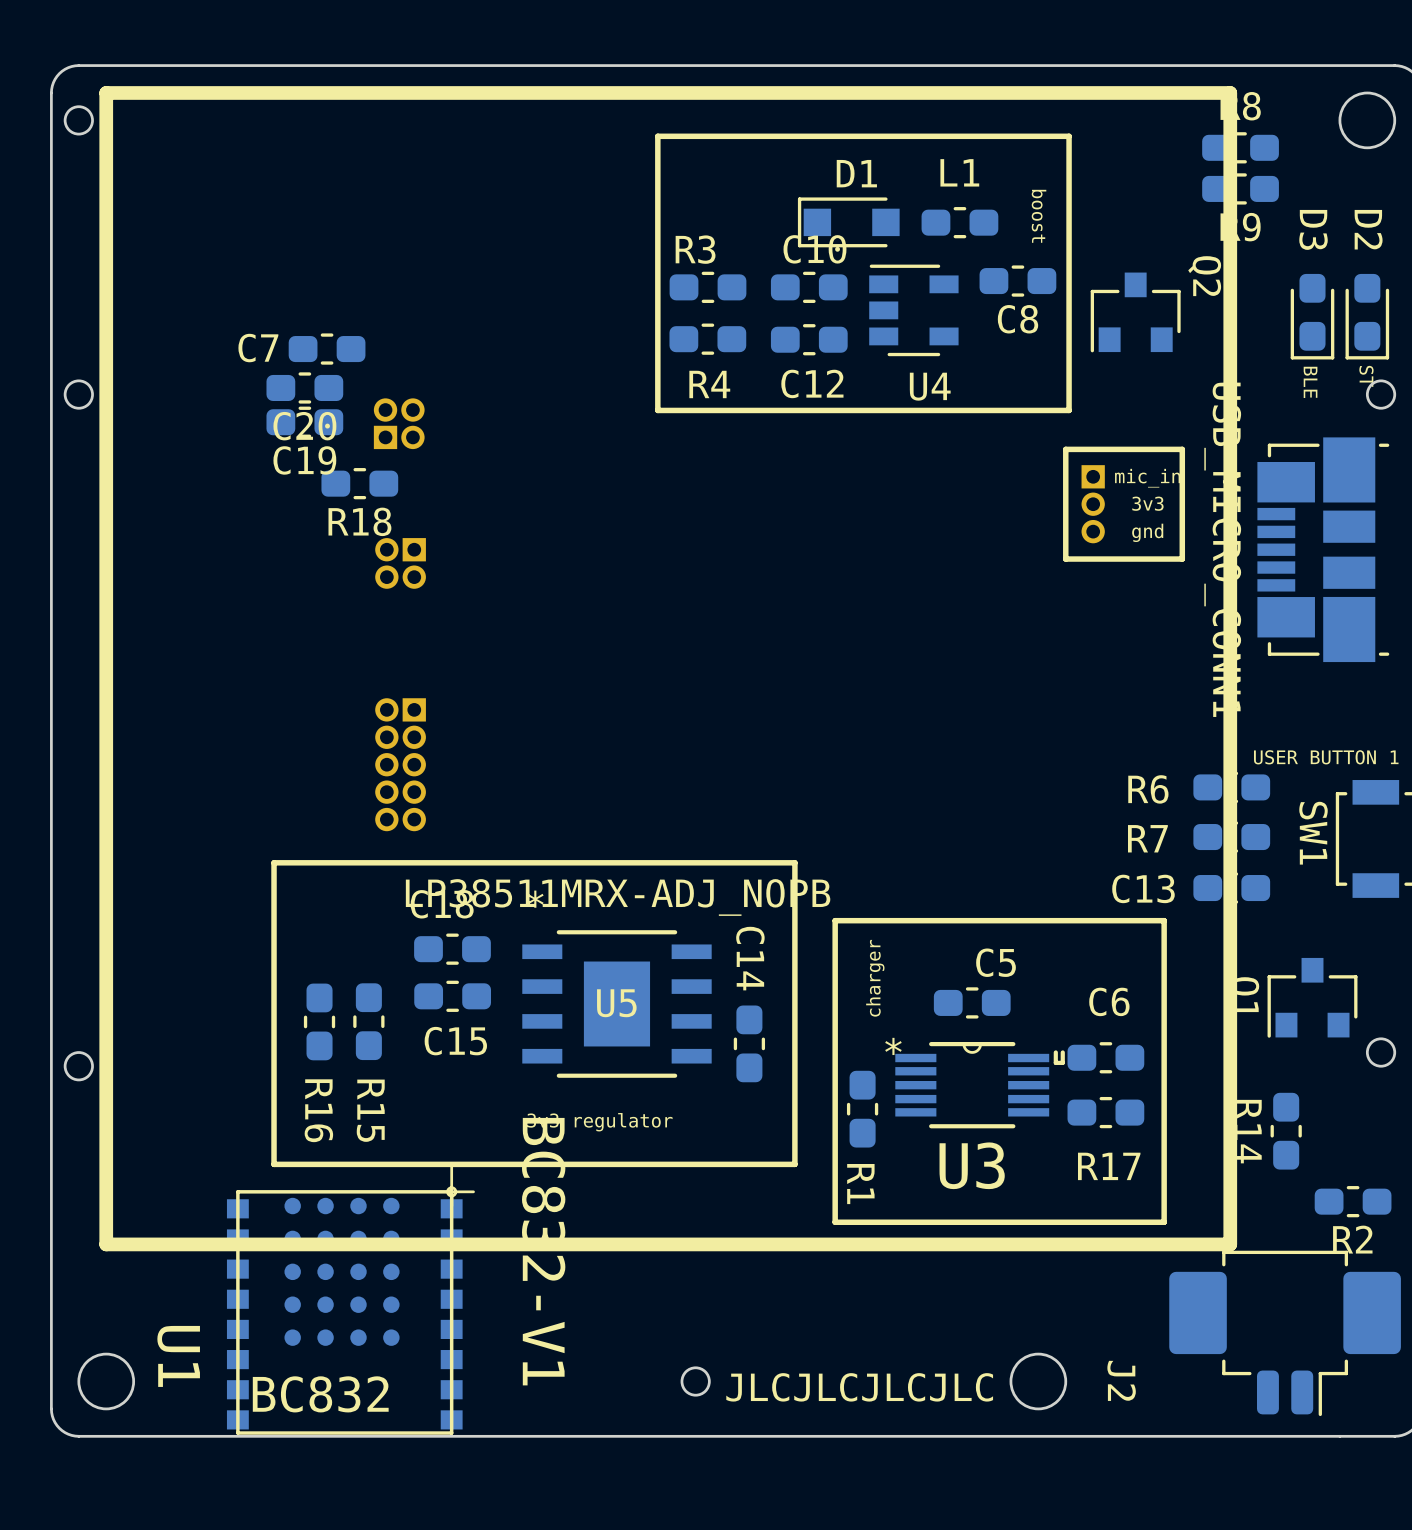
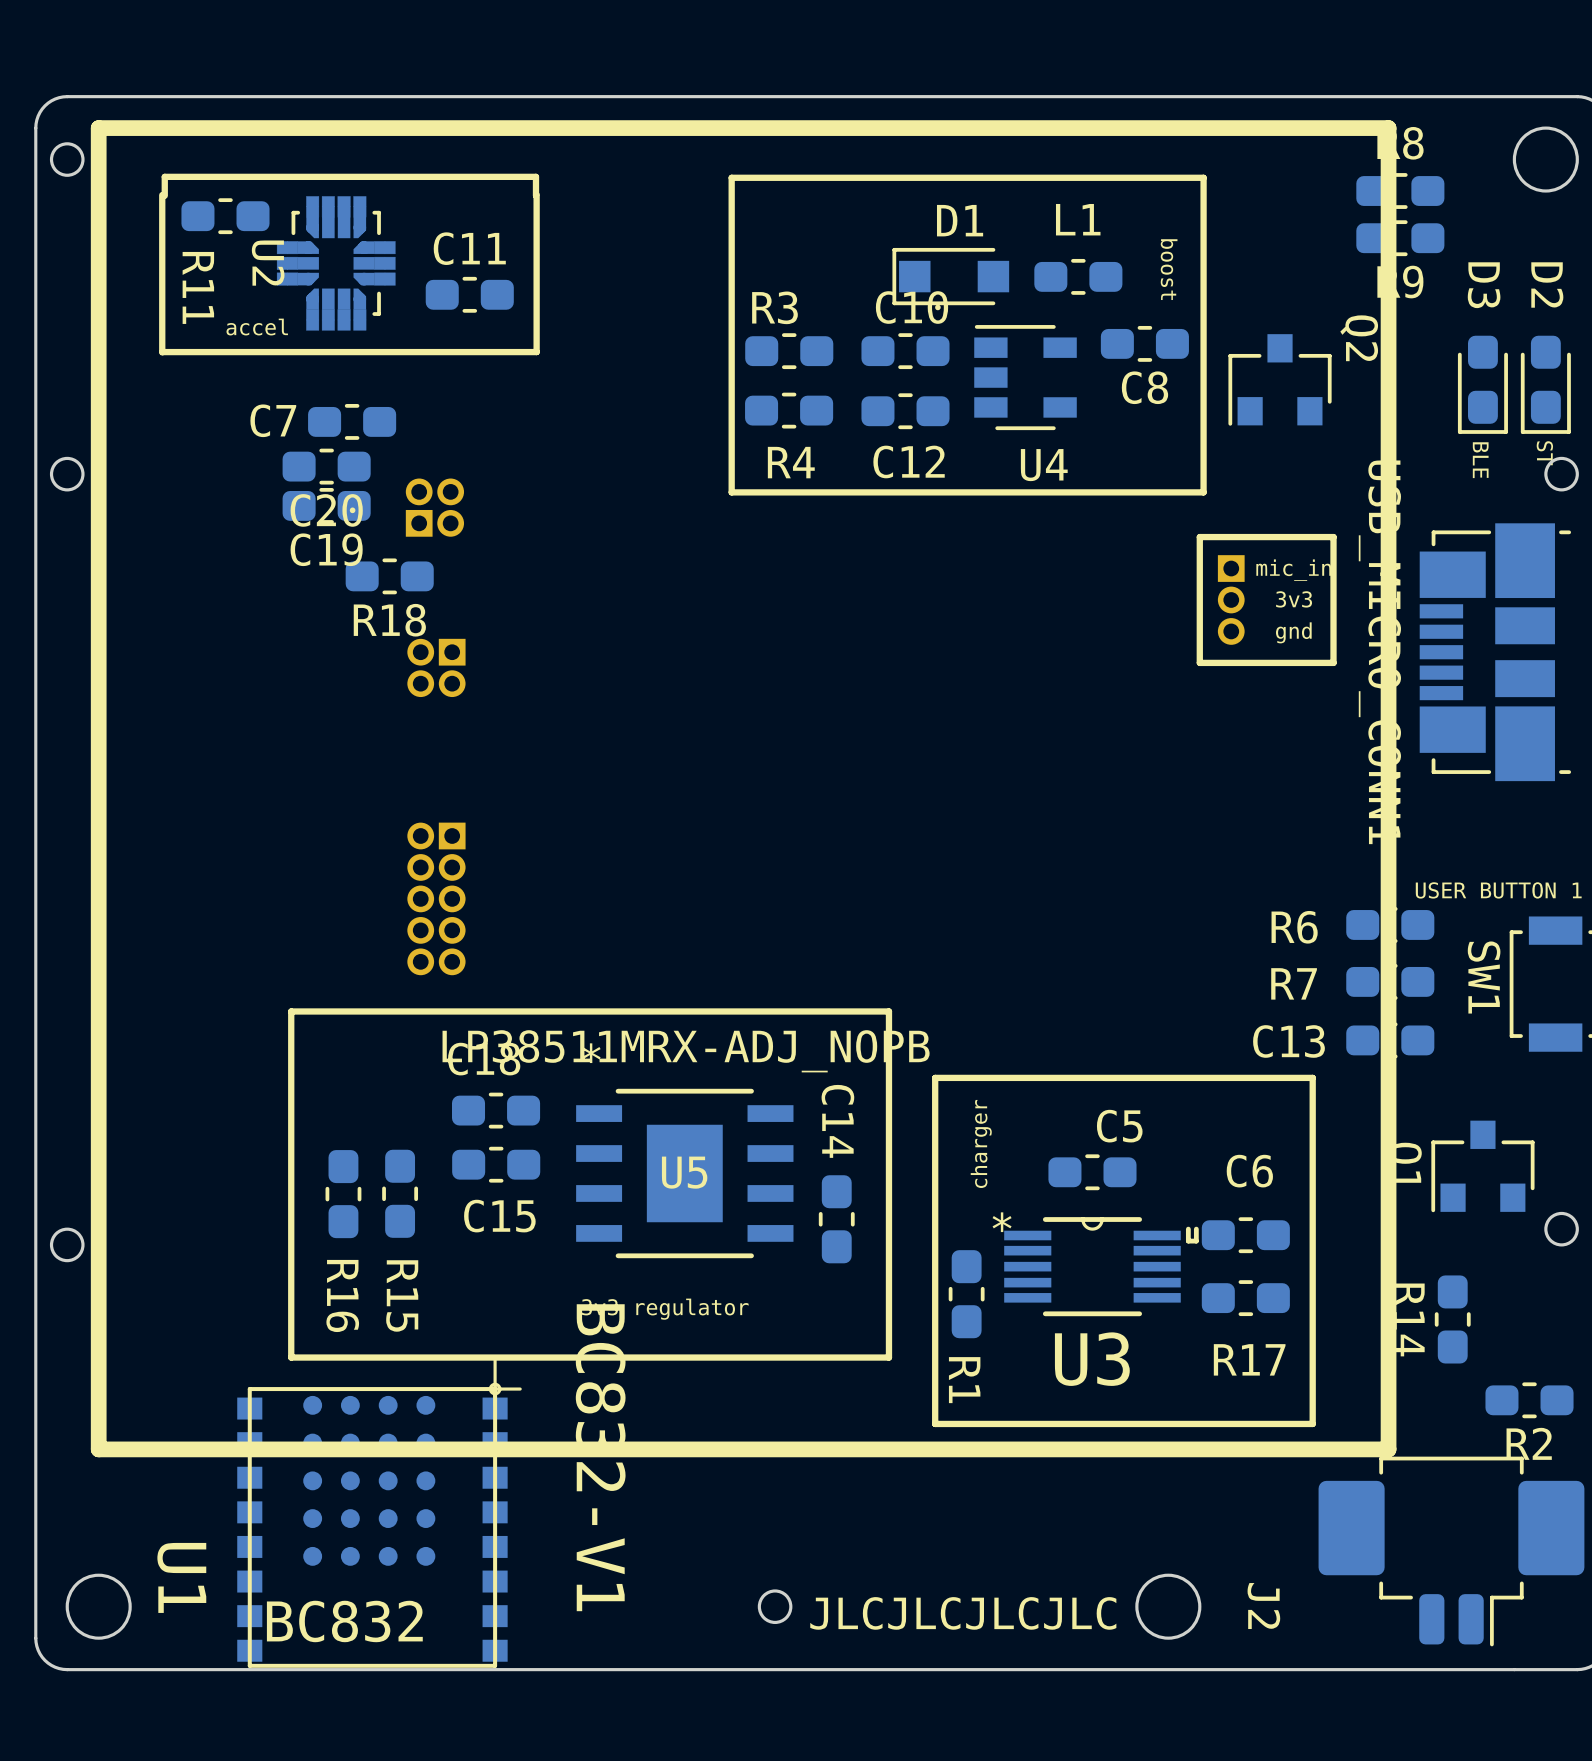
line: none -> (162, 195) (162, 352)
line: none -> (536, 194) (536, 352) (162, 352)
line: none -> (535, 195) (535, 176) (164, 176) (164, 195)
R11: none -> (225, 216)
U2: none -> (336, 263)
C11: none -> (469, 294)
text: none -> accel (257, 327)

